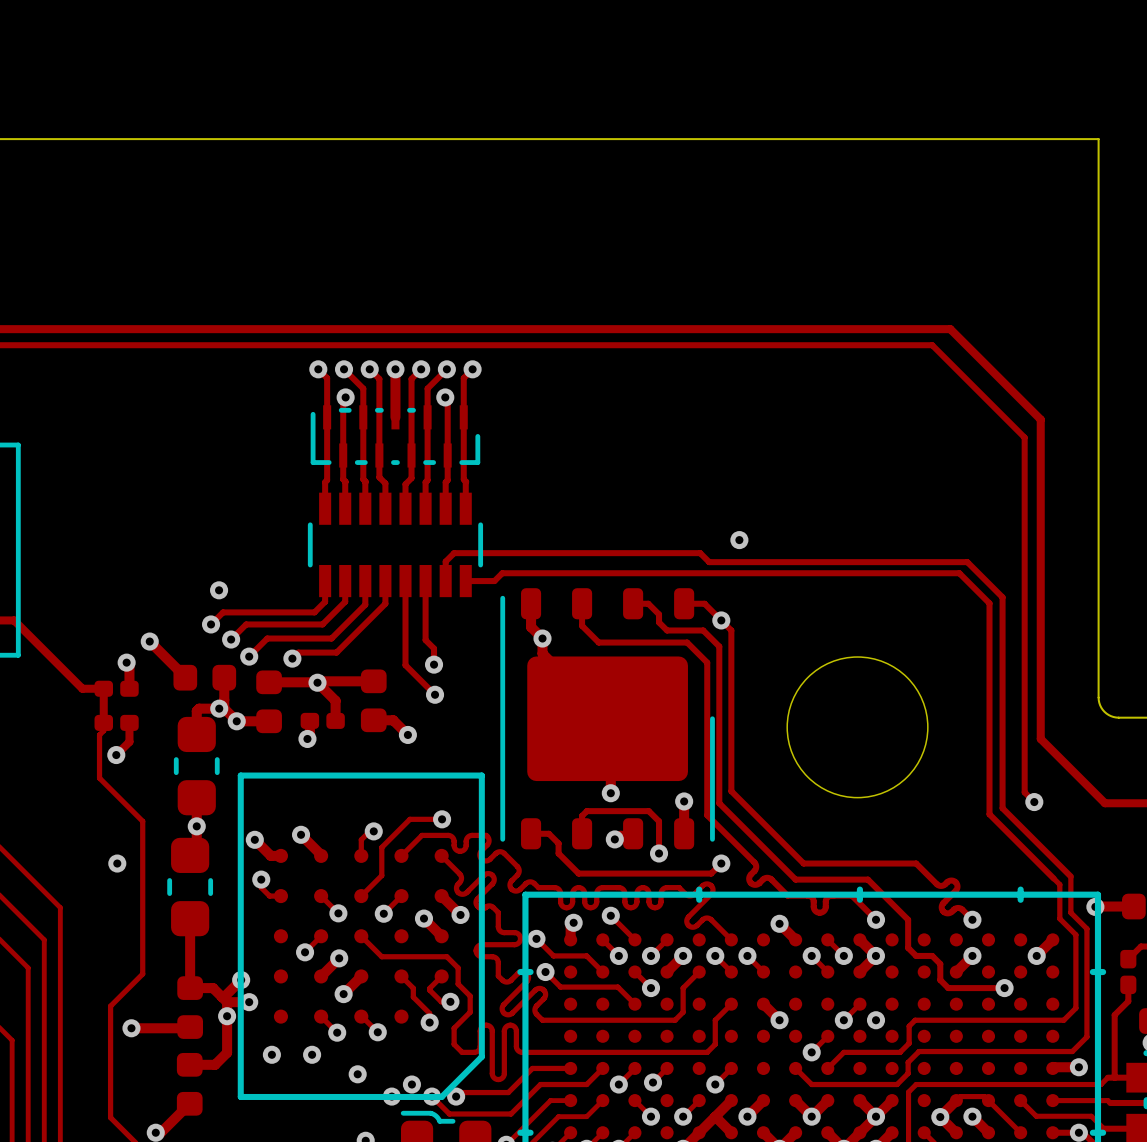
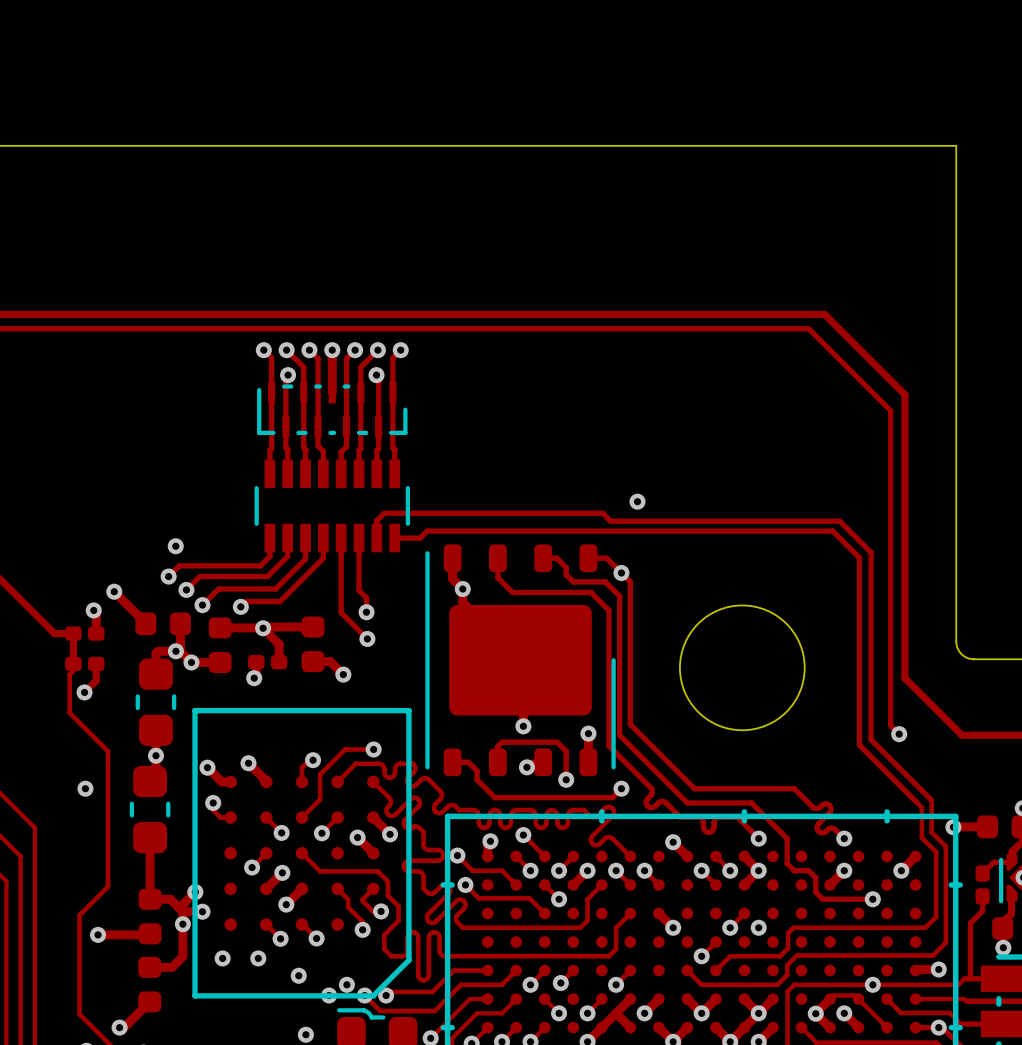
via: none -> (872, 984)

